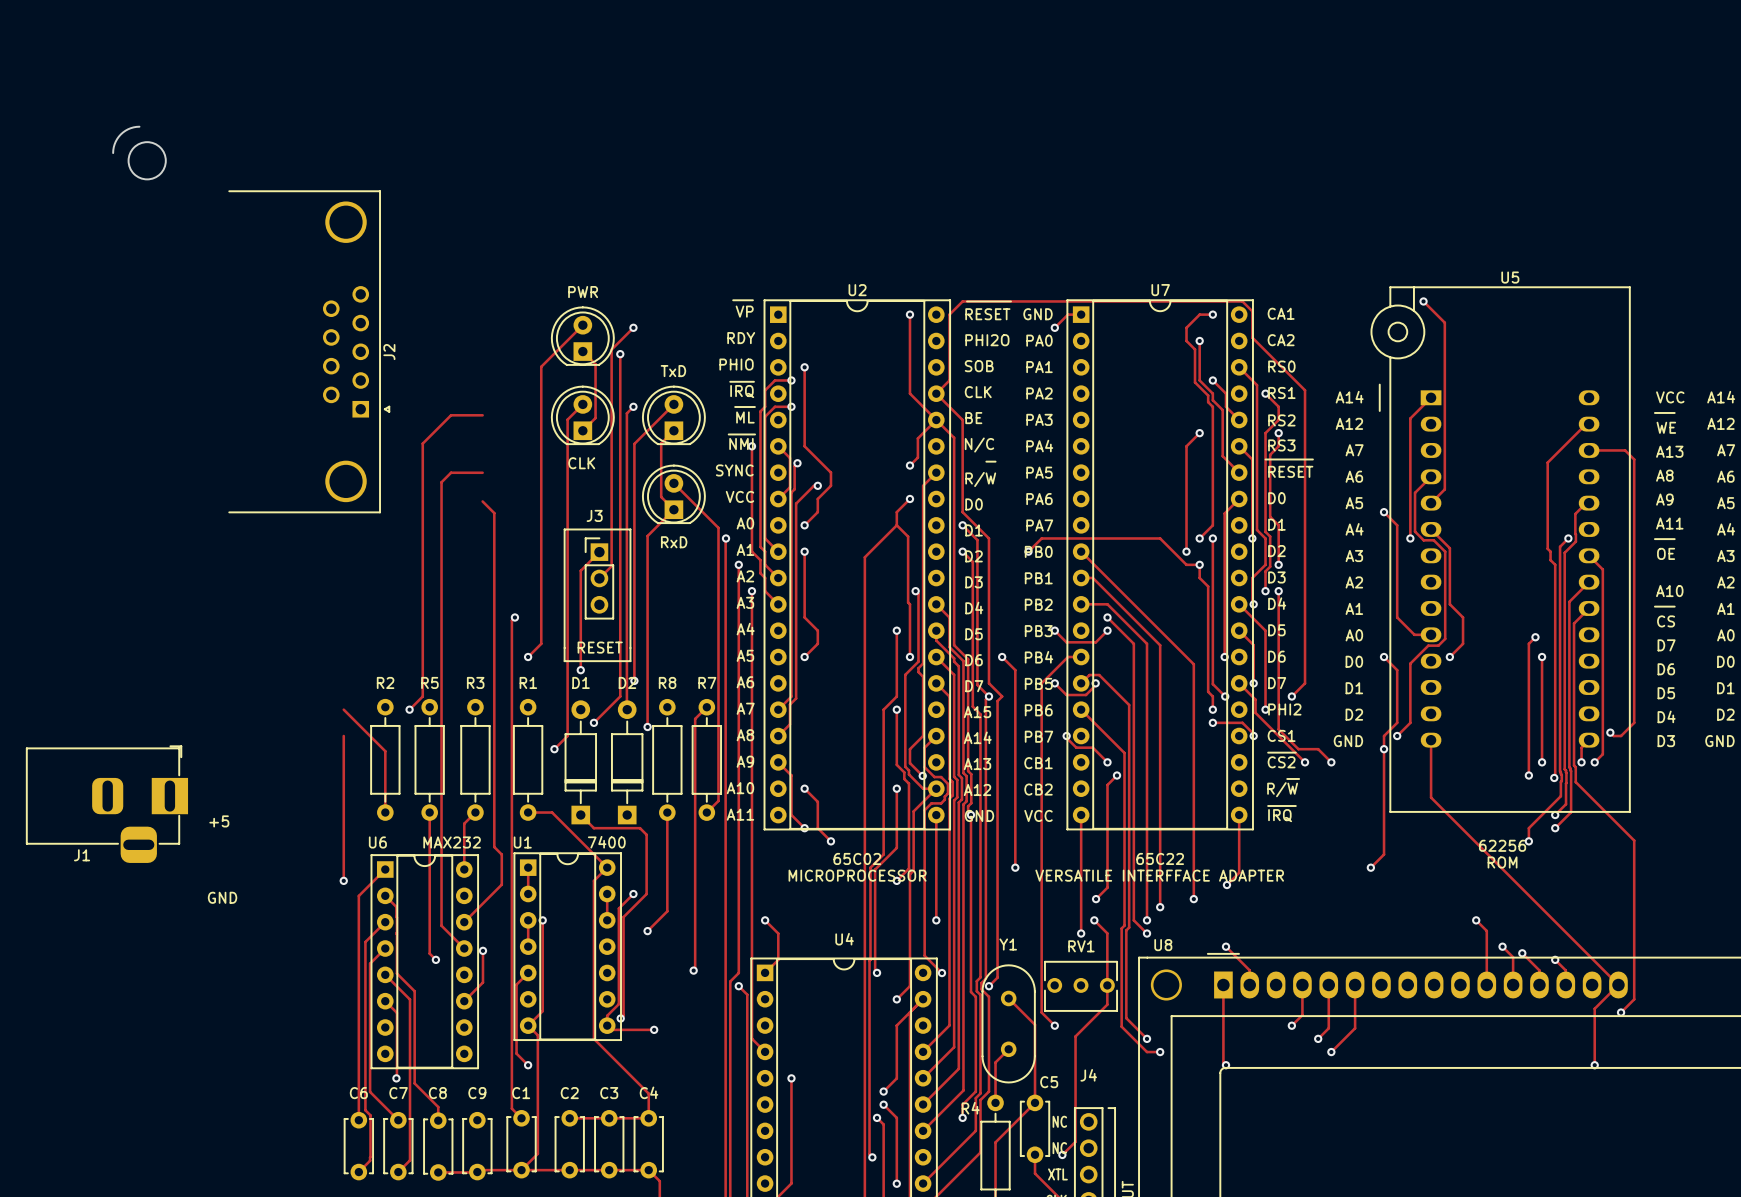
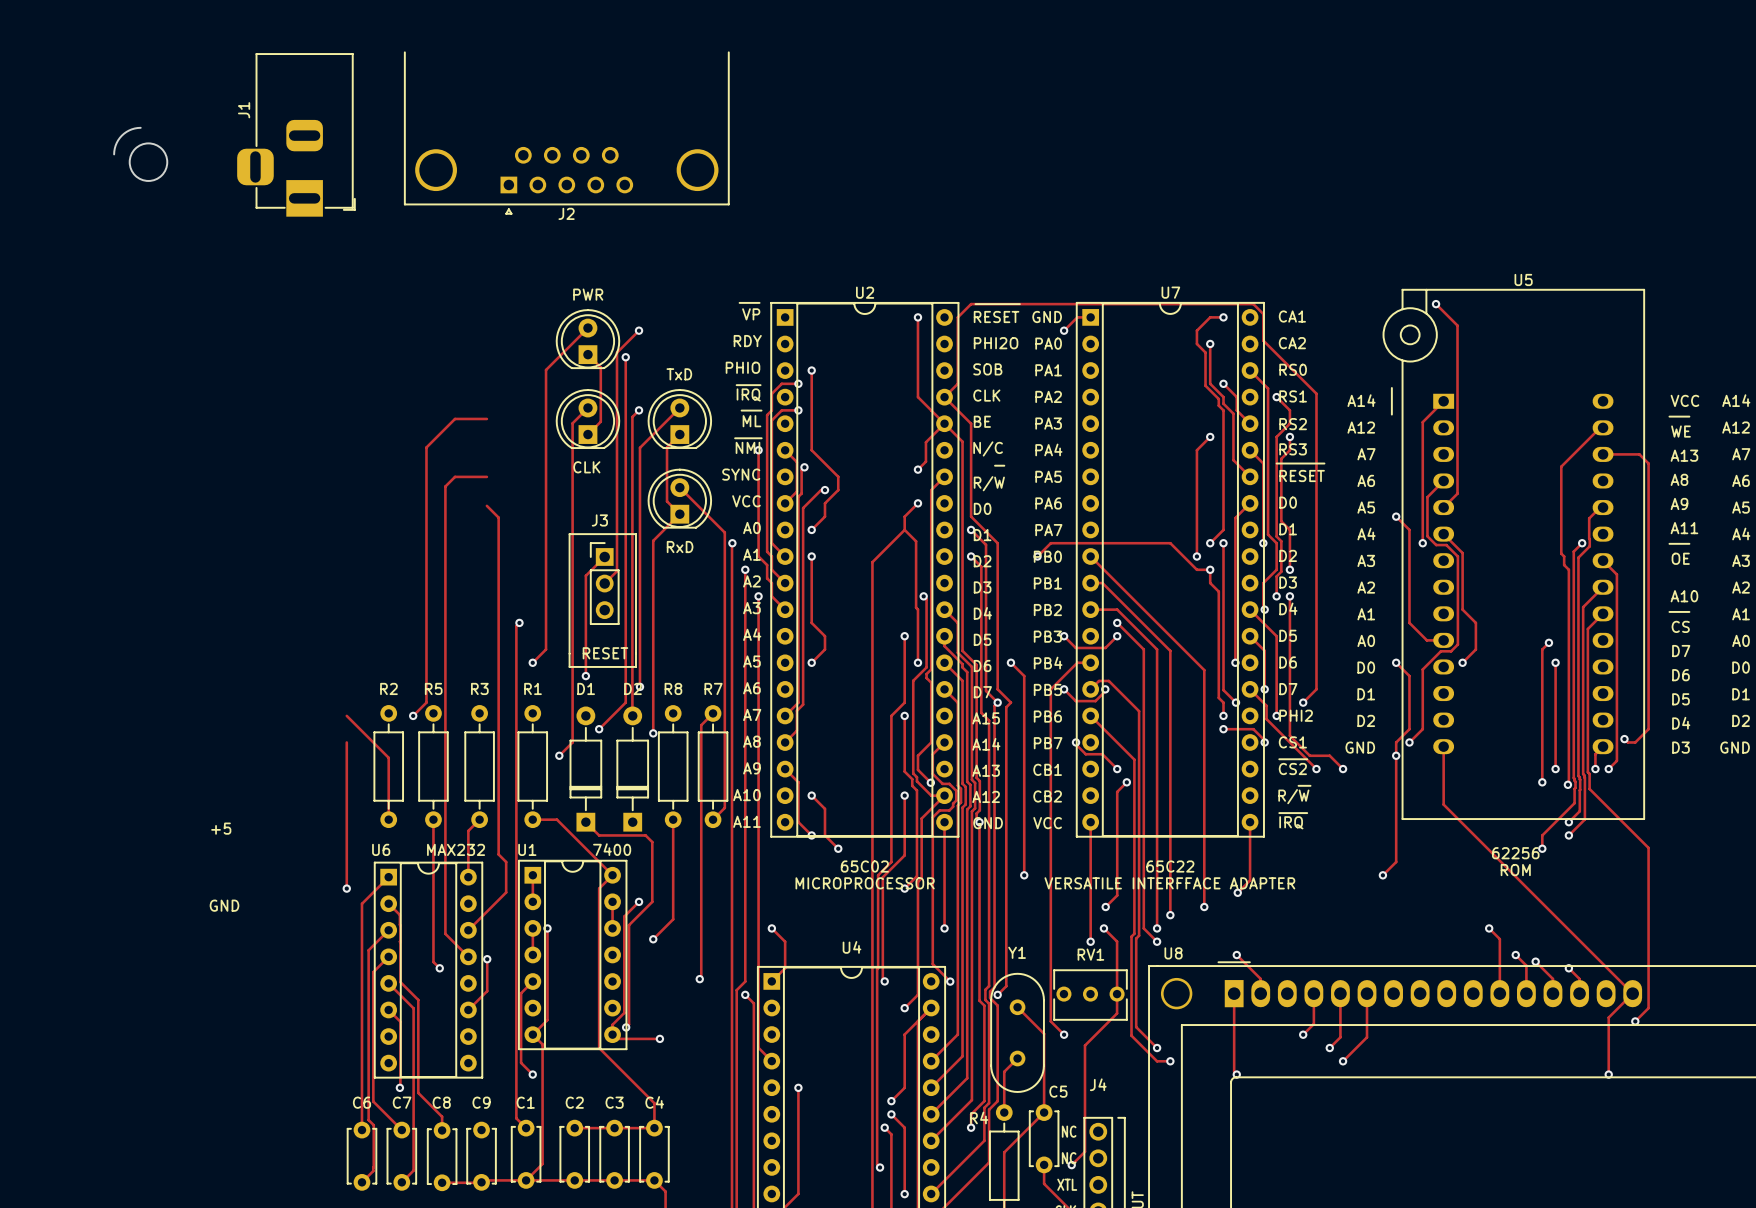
J2 rotation: 0° (309, 351) -> 90° clockwise (566, 133)
J2 position: (309, 351) -> (566, 133)
J1 rotation: 0° (107, 804) -> 90° clockwise (296, 135)
J1 position: (107, 804) -> (296, 135)

